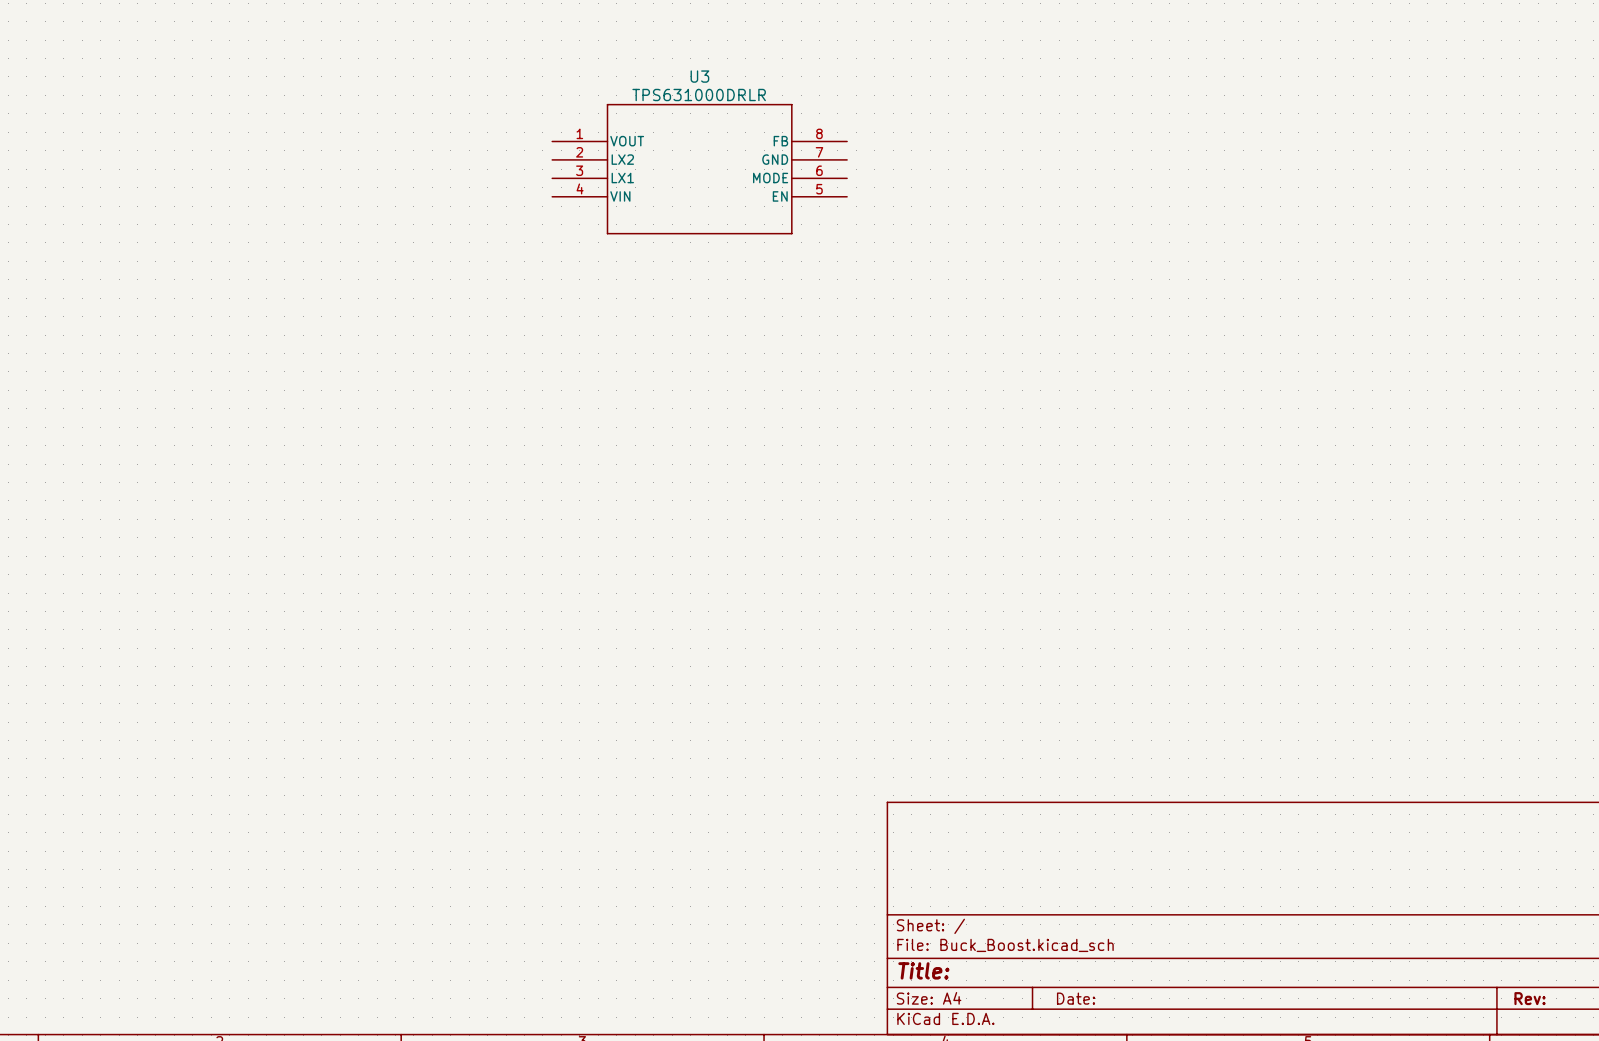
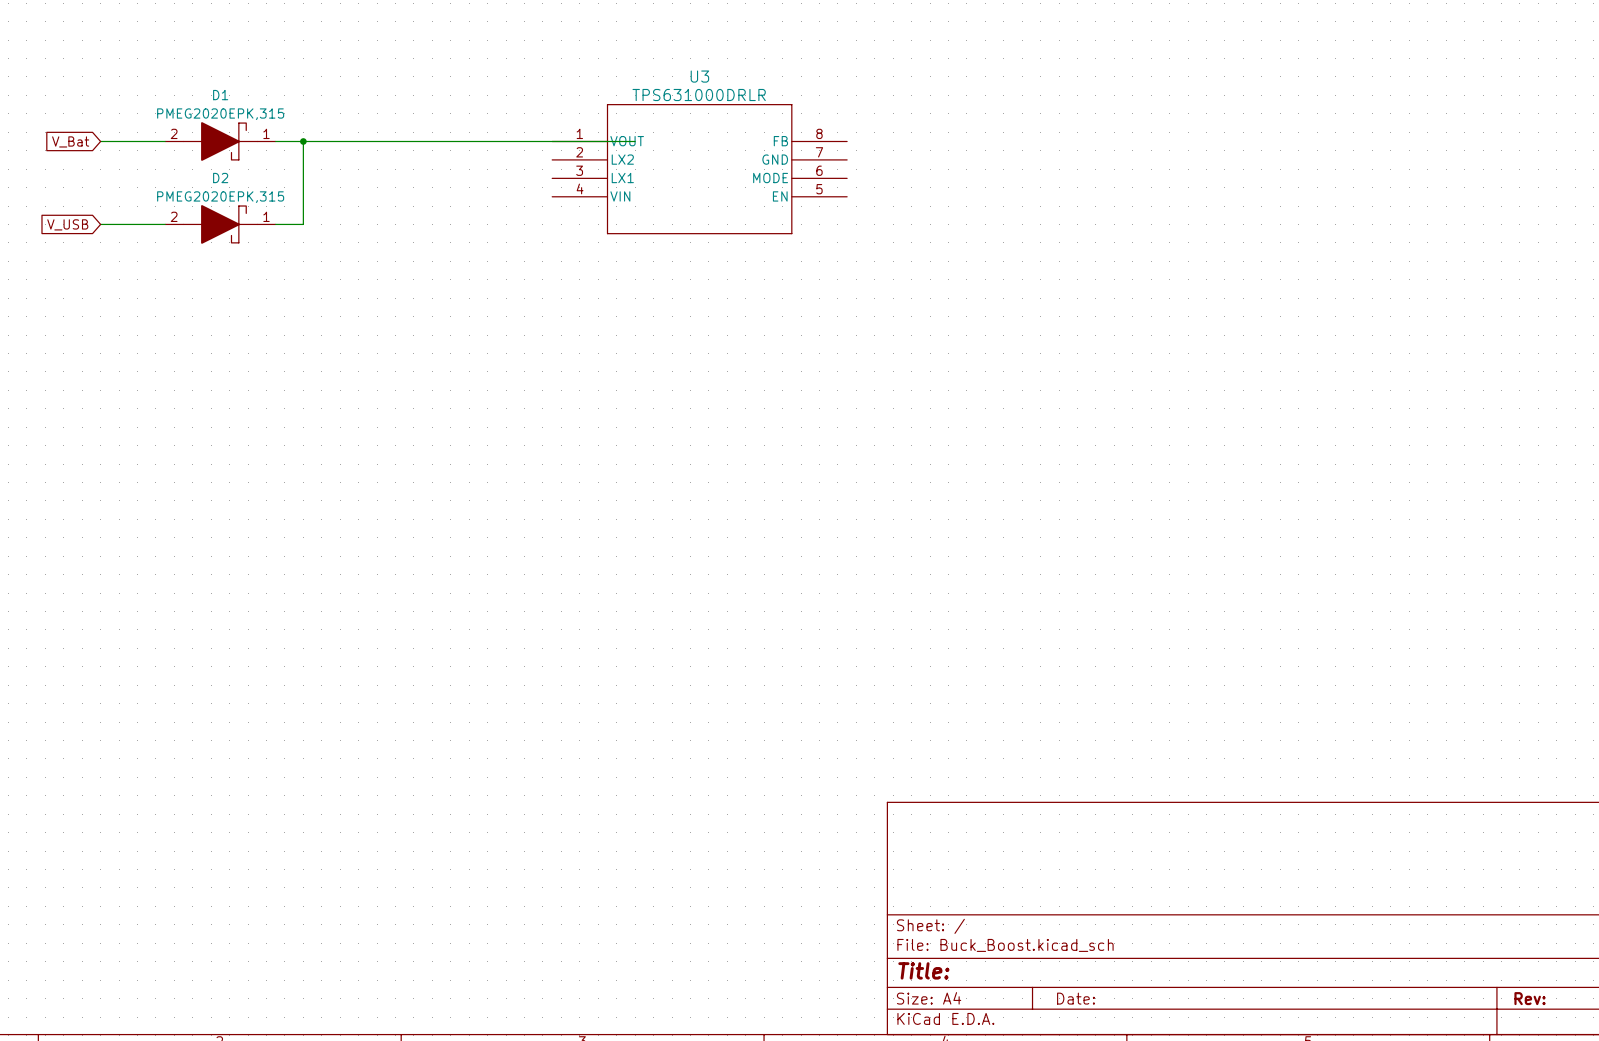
global label: none -> V_Bat (70, 141)
wire: none -> (100, 141) (165, 141)
D1: none -> PMEG2020EPK,315 (220, 141)
wire: none -> (275, 141) (635, 141)
wire: none -> (303, 141) (303, 224) (275, 224)
junction: none -> (303, 141)
global label: none -> V_USB (67, 224)
wire: none -> (100, 224) (165, 224)
D2: none -> PMEG2020EPK,315 (220, 224)

